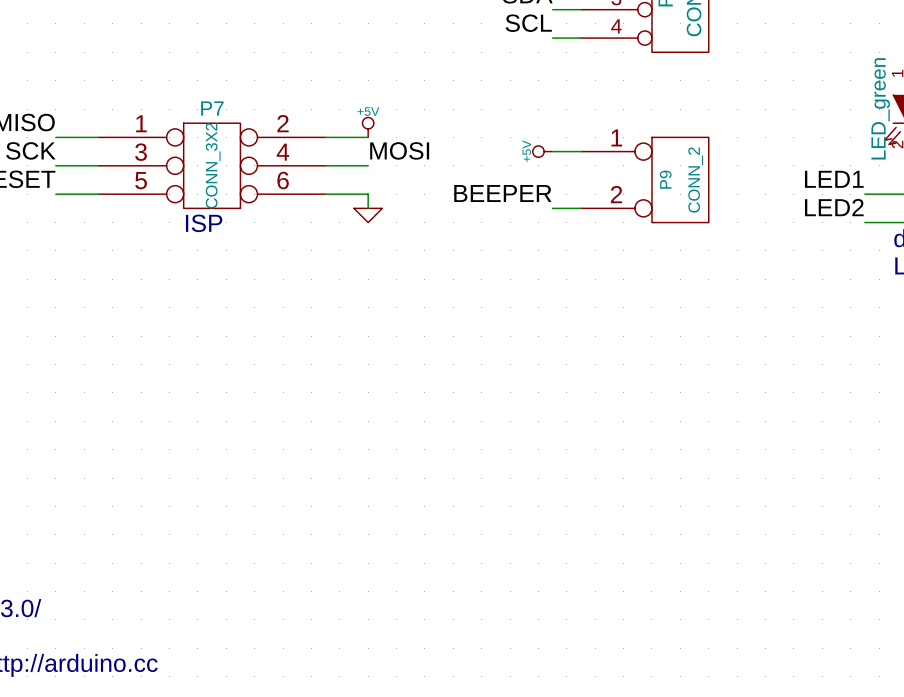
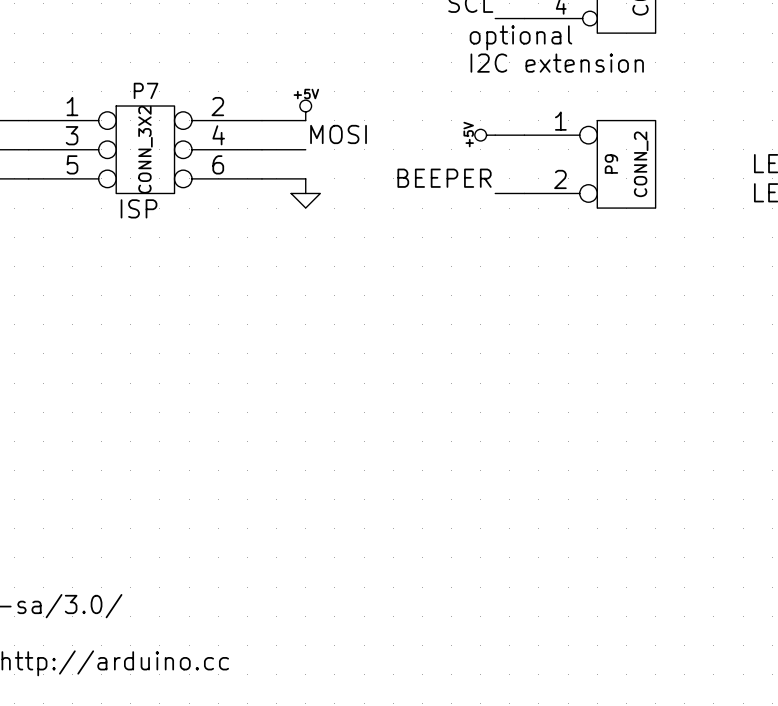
text: none -> optional (520, 37)
text: none -> I2C extension (557, 63)

